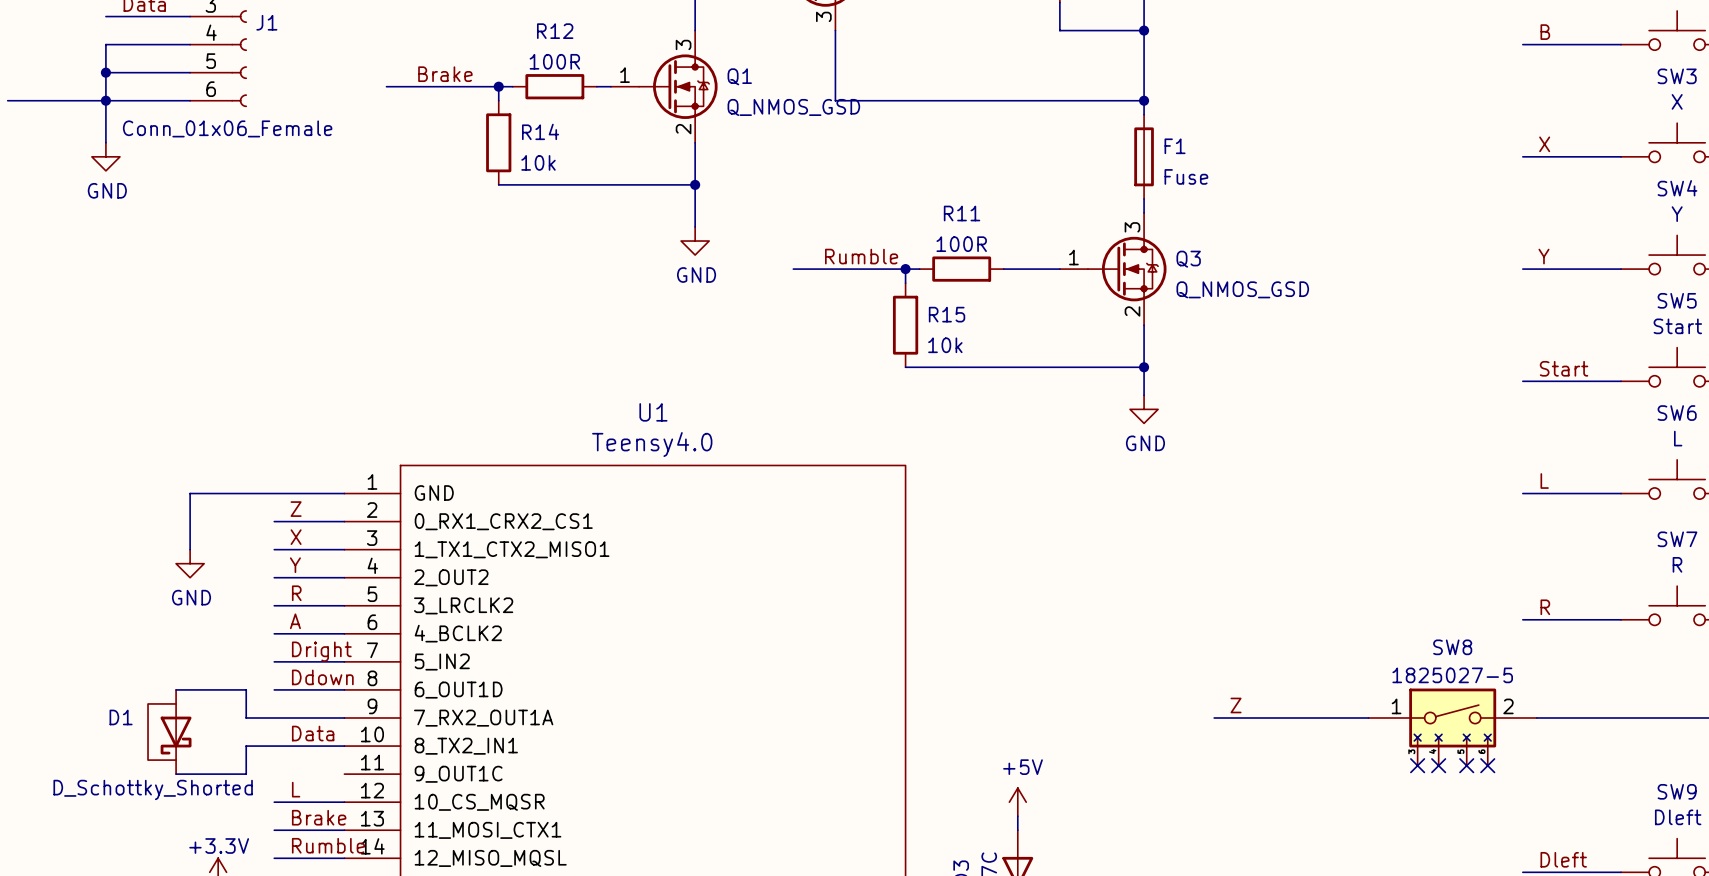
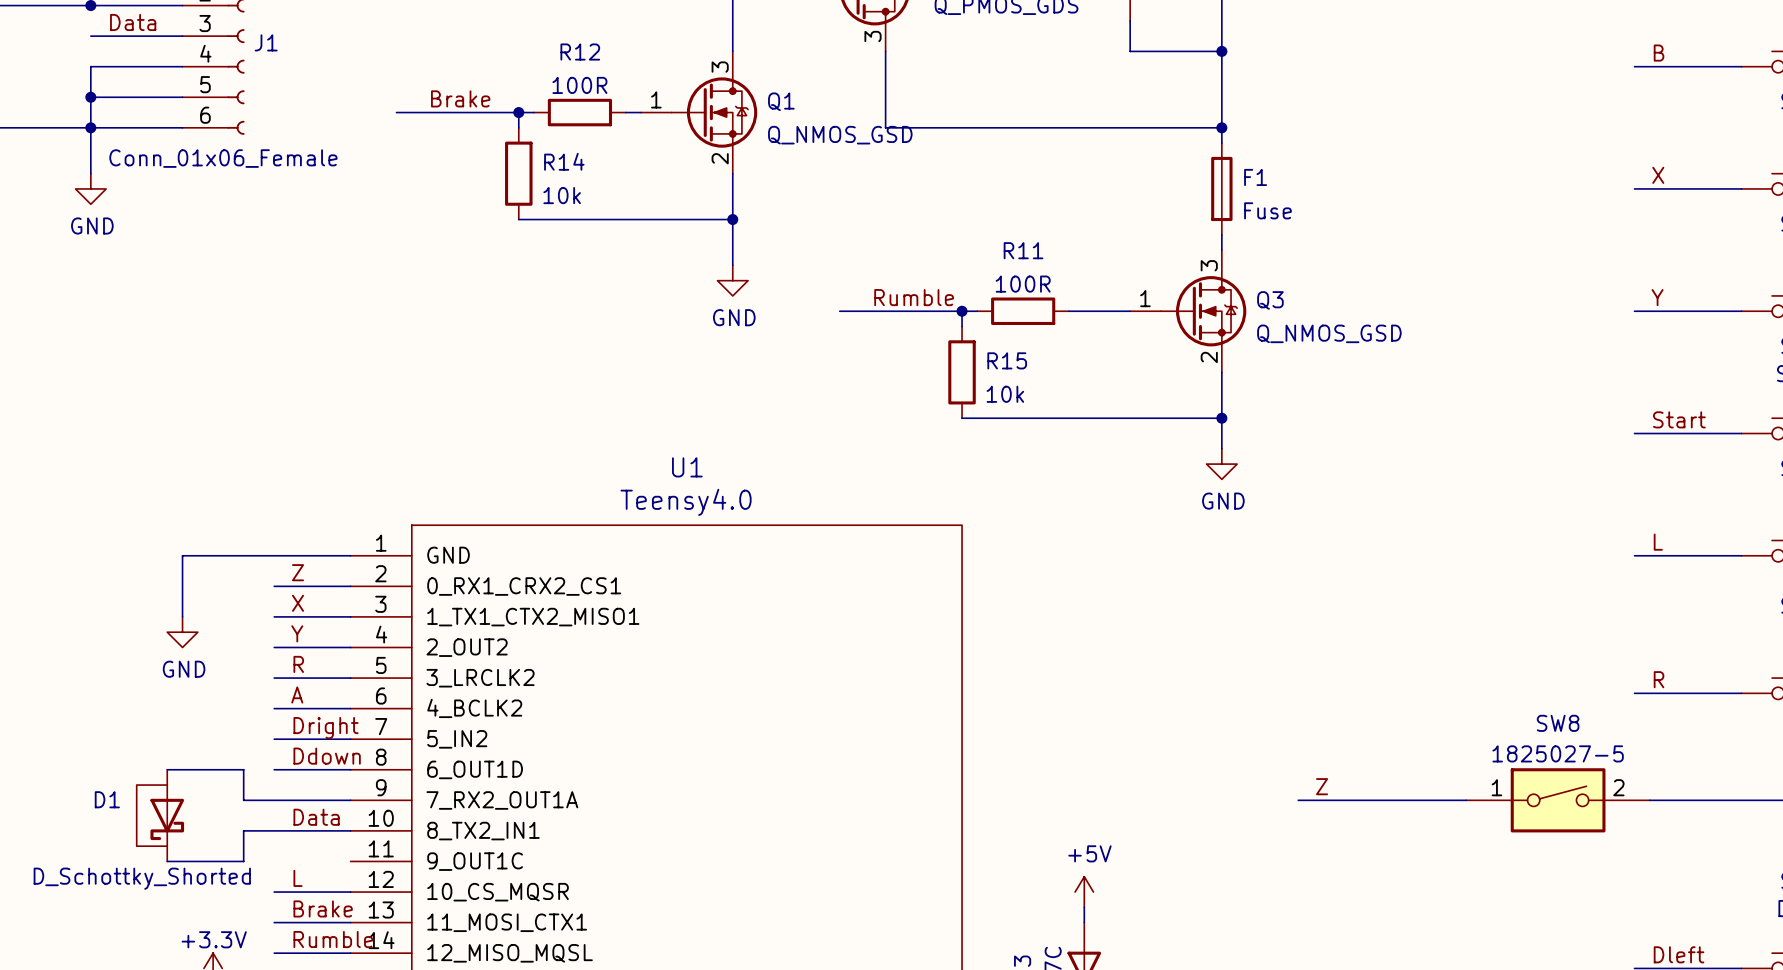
SW8 symbol: [1368, 688, 1537, 766] -> [1466, 768, 1650, 833]
no-connect mark: (1417, 765) -> none
no-connect mark: (1438, 765) -> none
no-connect mark: (1466, 765) -> none
no-connect mark: (1487, 765) -> none

